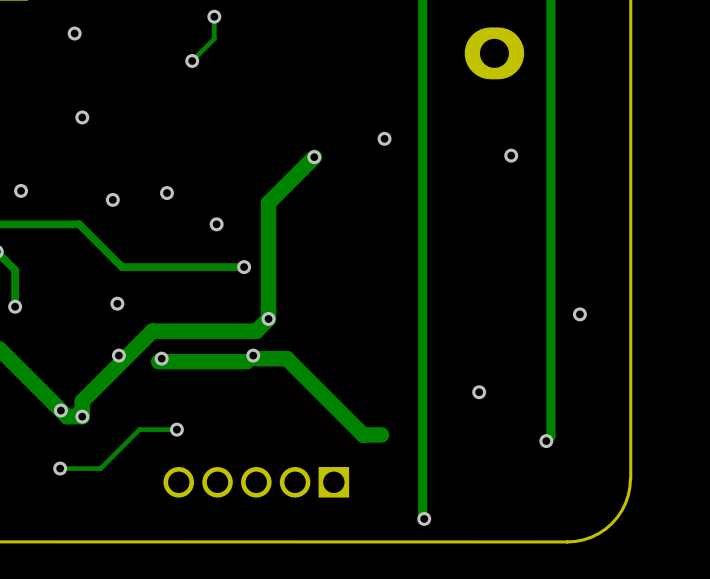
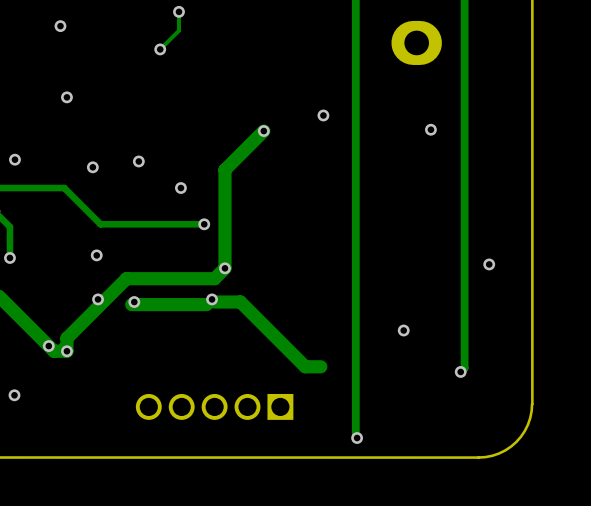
track: (176, 429) (139, 429) (100, 468) (60, 468) -> none
via: (176, 429) -> none
via position: (60, 468) -> (14, 395)

